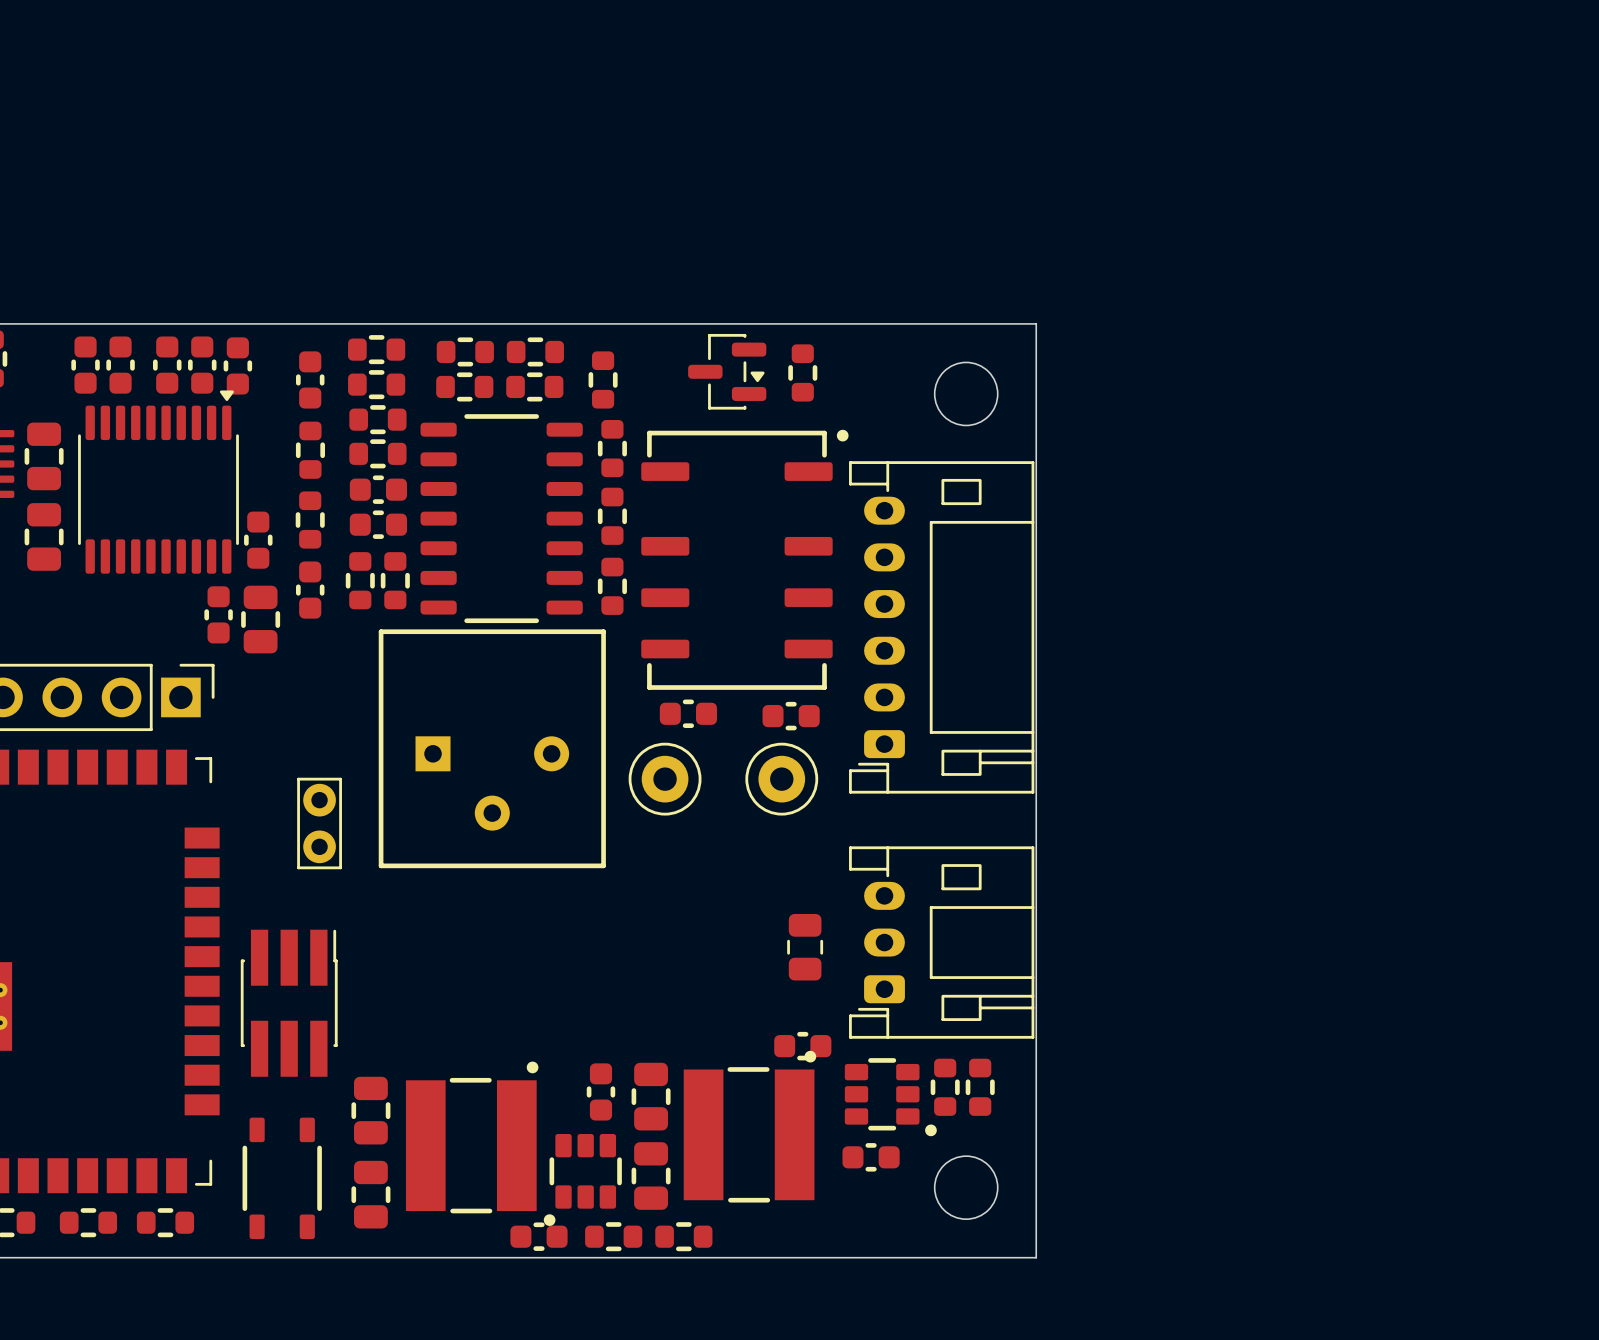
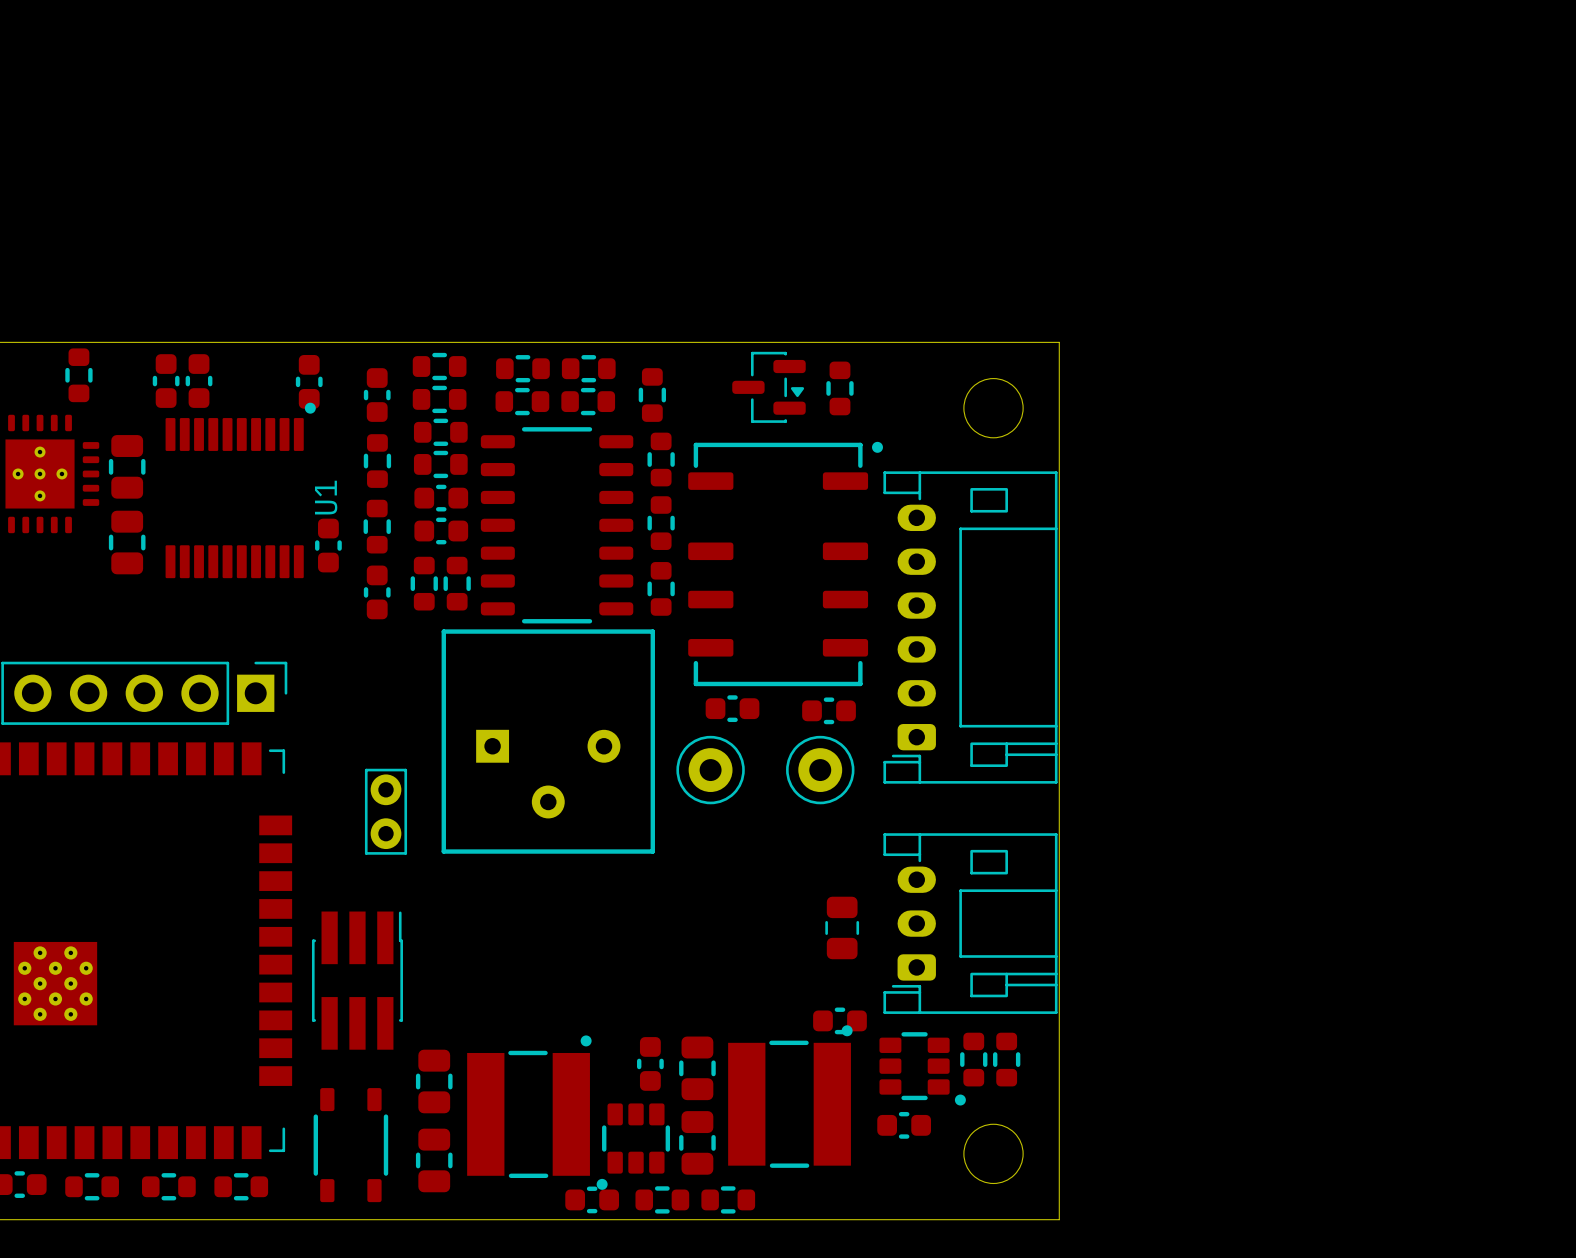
part: (167, 365) -> none
part: (202, 365) -> none
U1: none -> (240, 490)
part: (158, 482) -> none
part: (218, 614) -> none
part: (260, 619) -> none

